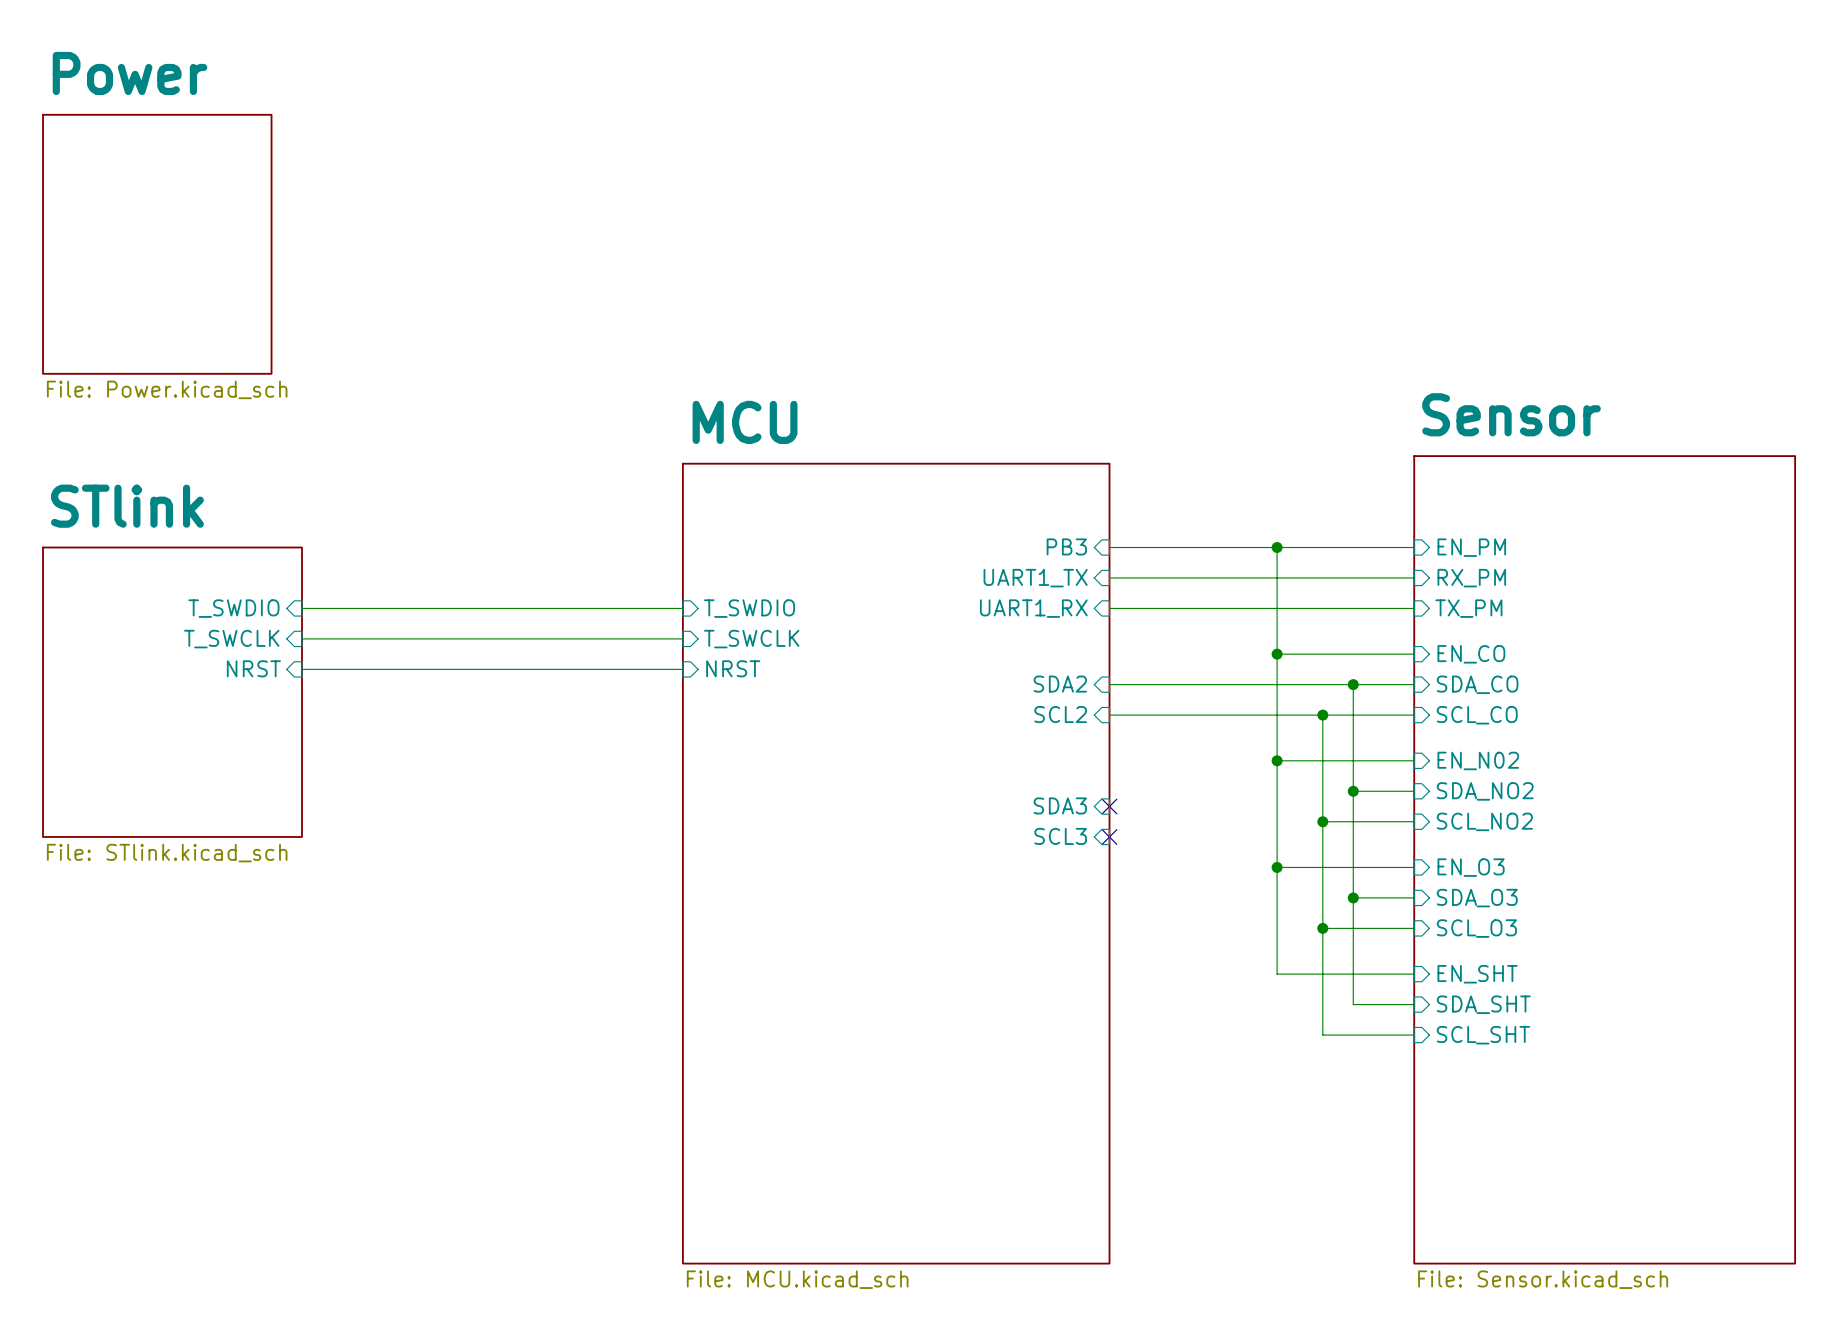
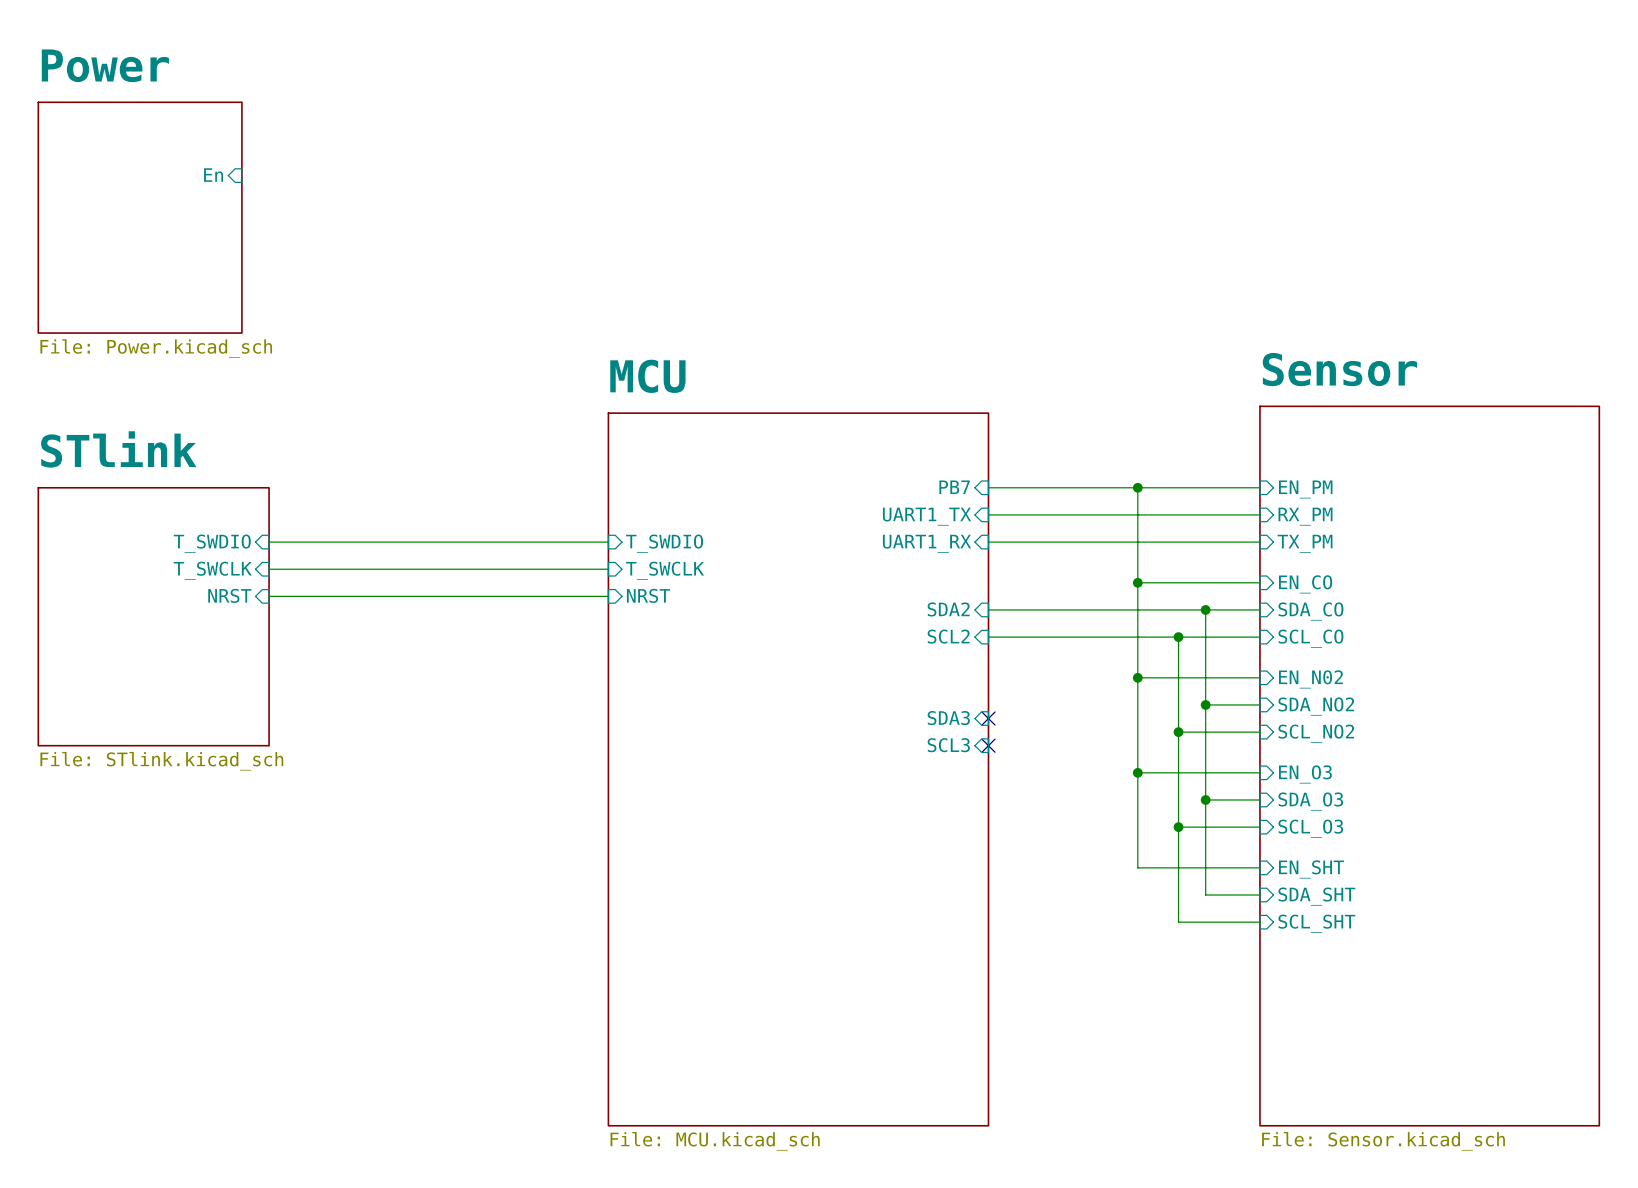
sheet pin: none -> En (213, 175)
sheet pin: PB3 (1066, 546) -> PB7 (954, 487)

